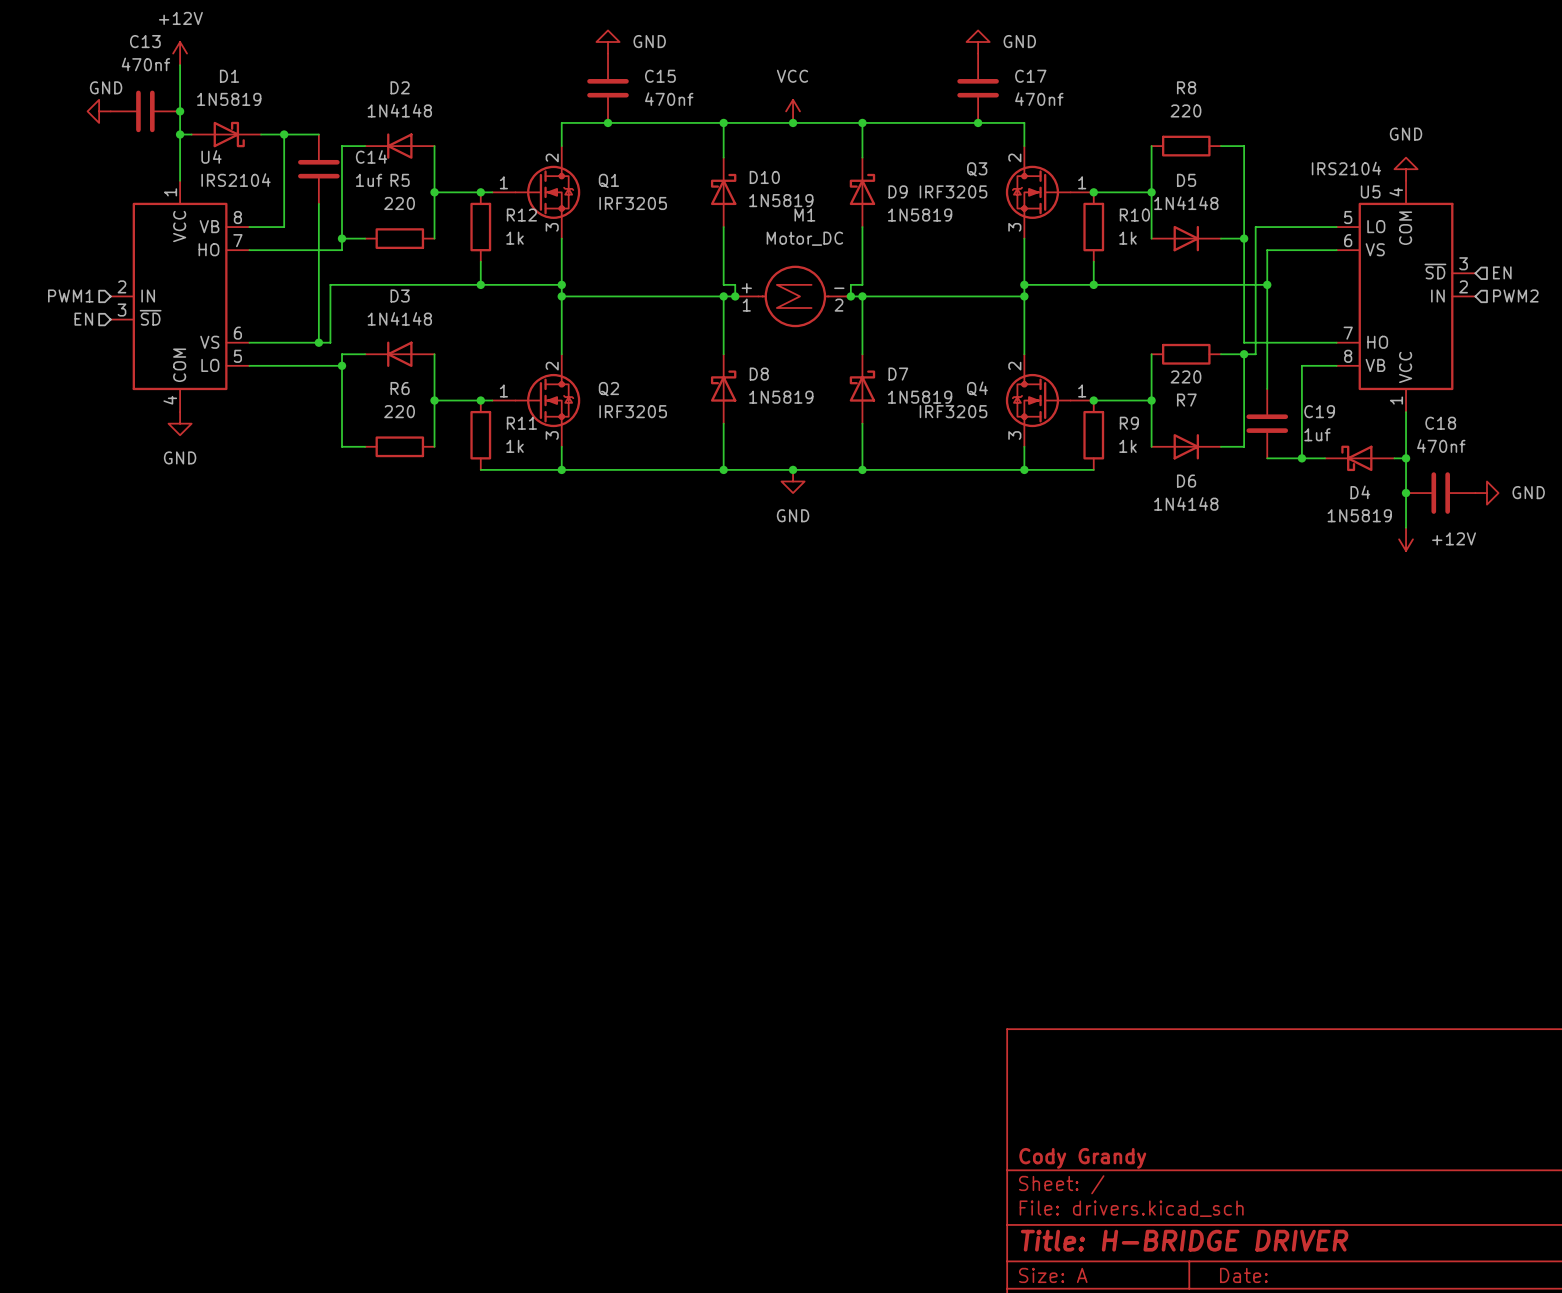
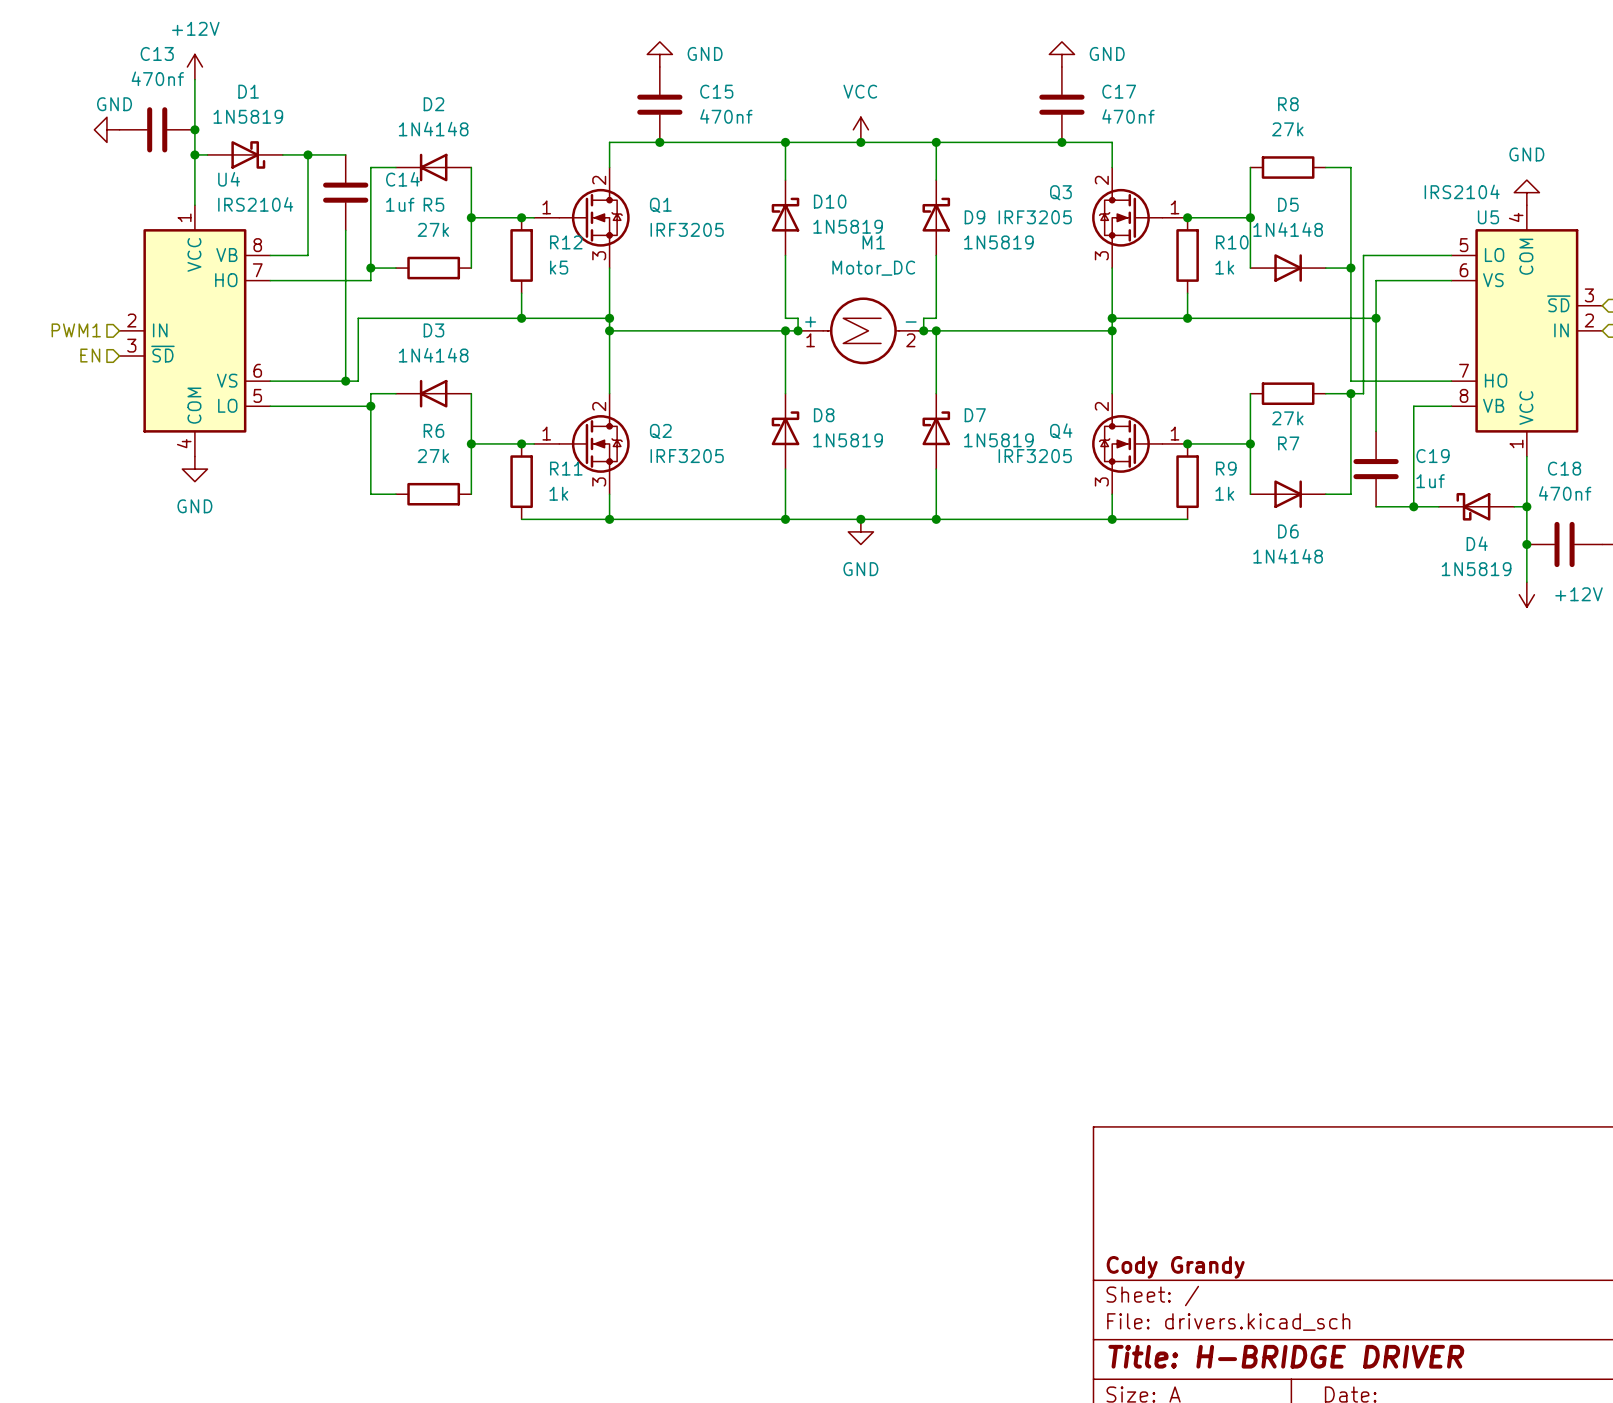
R8 value: 220 (1186, 110) -> 27k (1287, 129)
R5 value: 220 (399, 203) -> 27k (433, 229)
R12 value: 1k (515, 238) -> k5 (559, 267)
R7 value: 220 (1186, 376) -> 27k (1287, 418)
R6 value: 220 (399, 411) -> 27k (433, 456)

